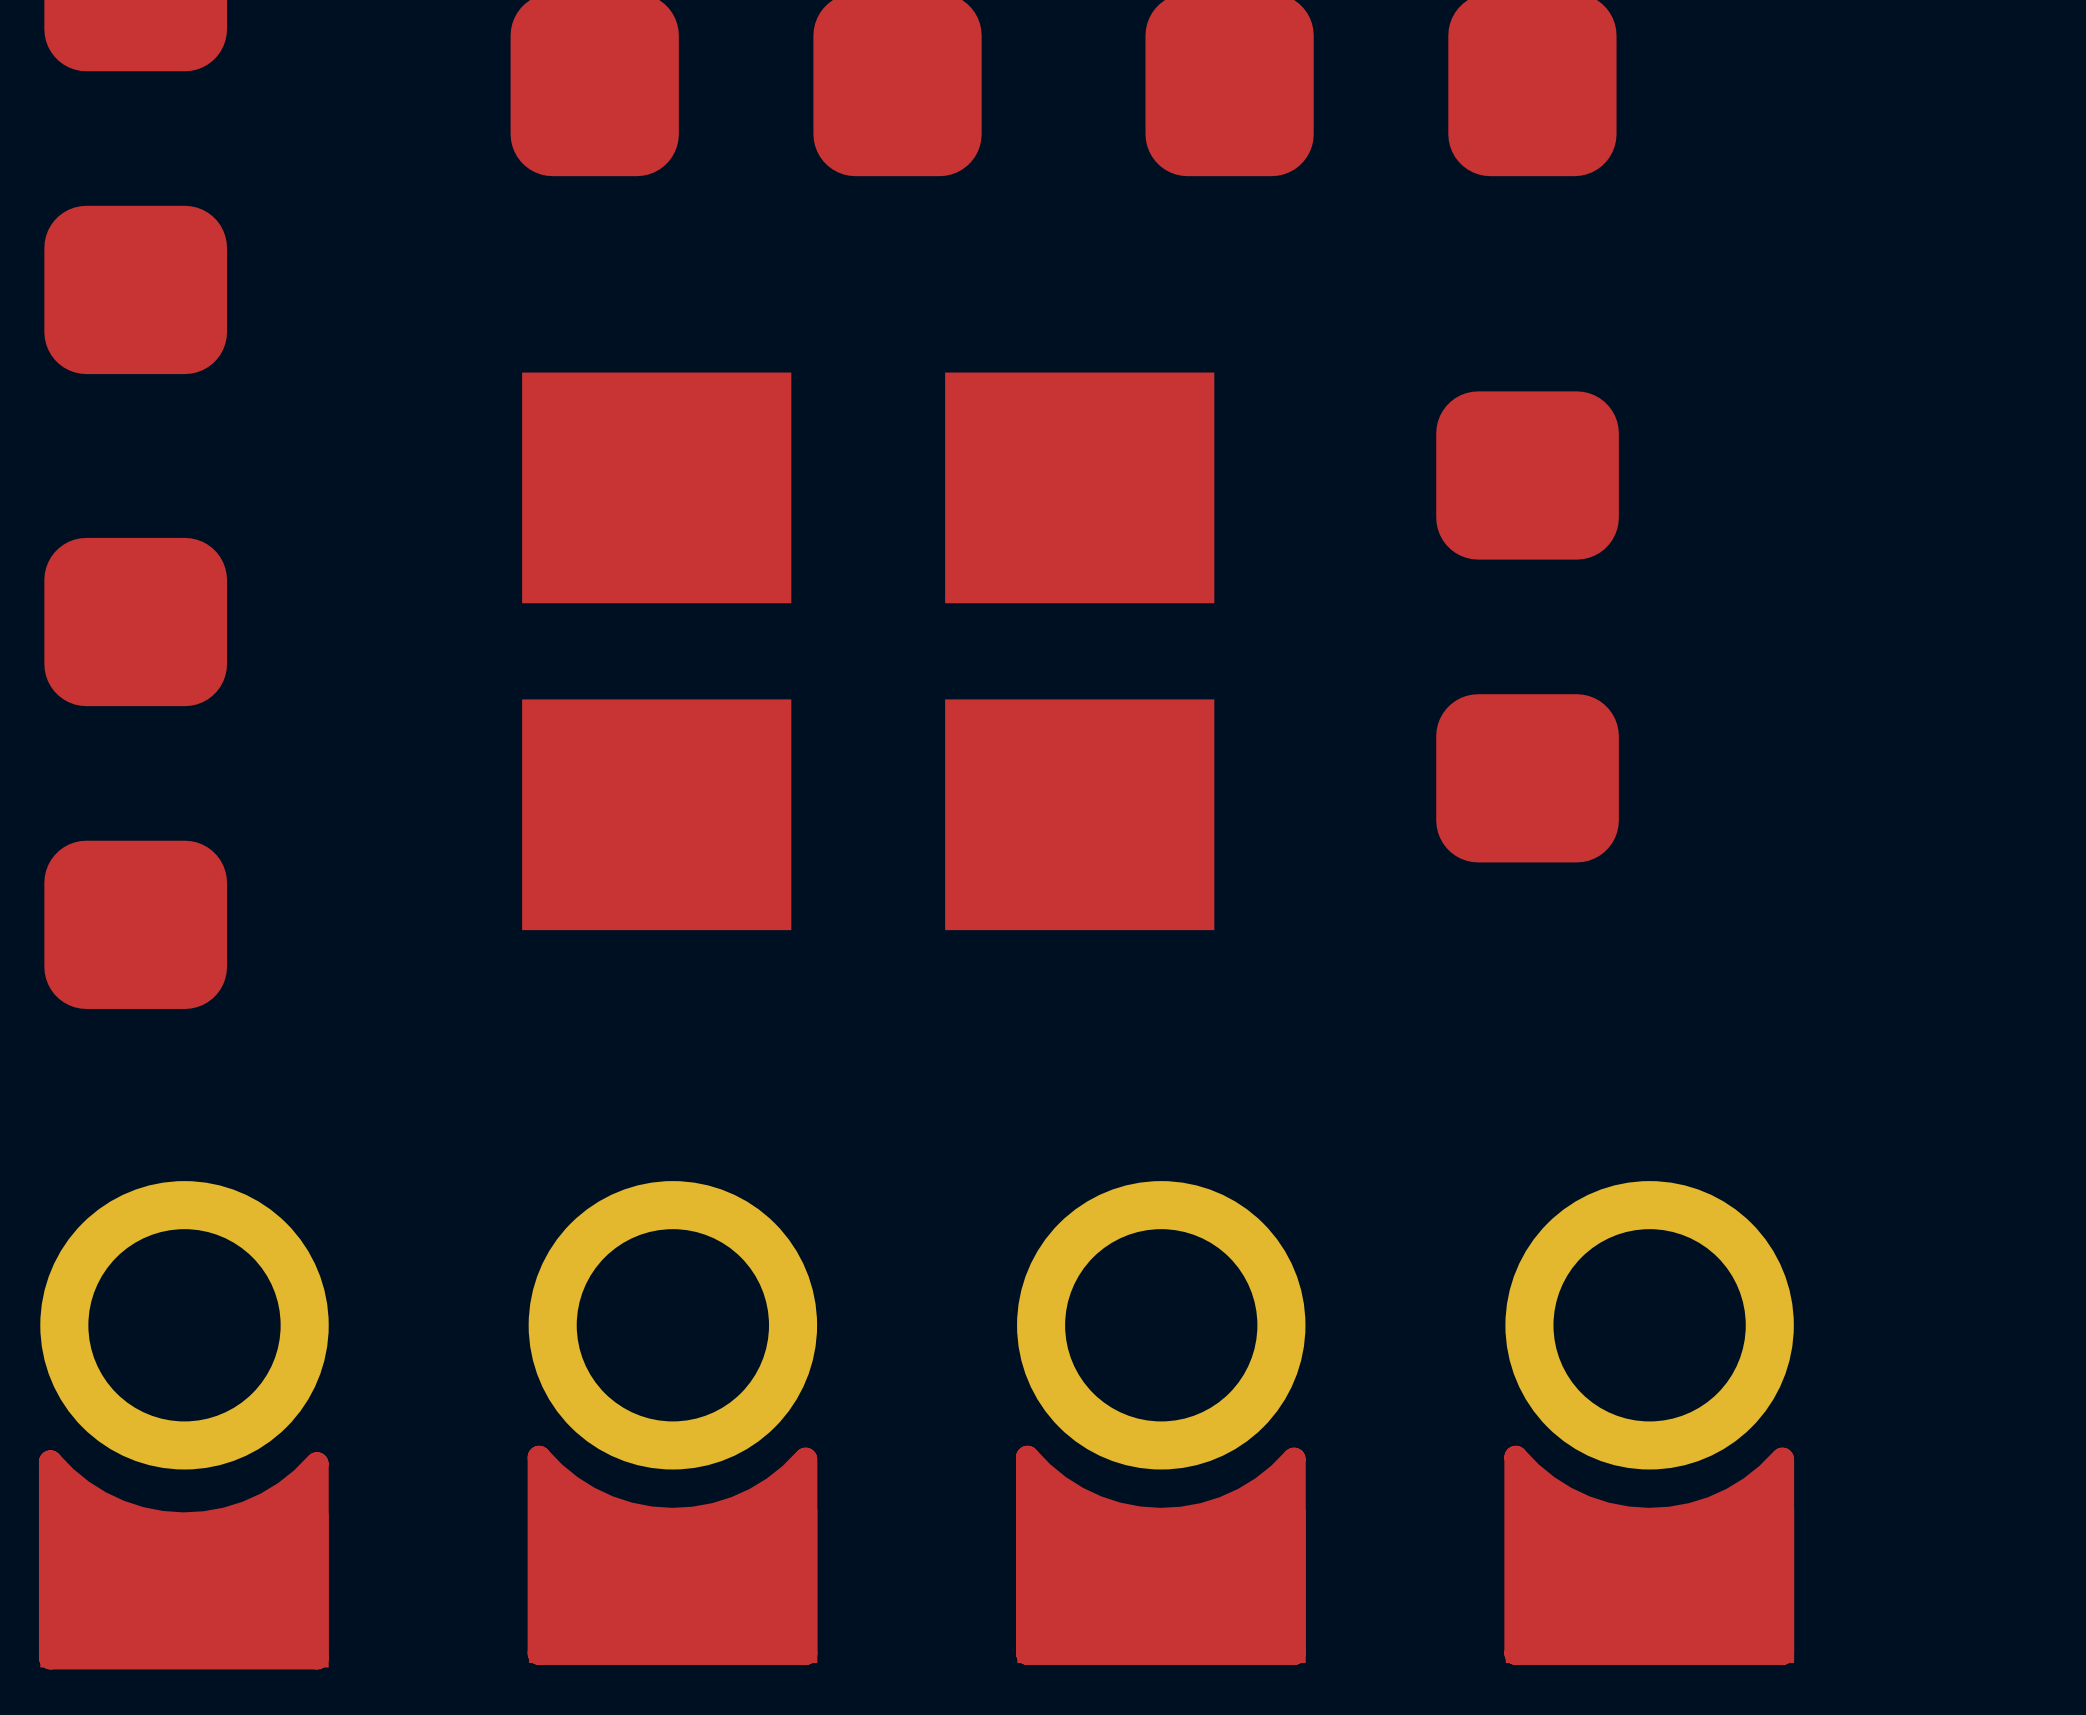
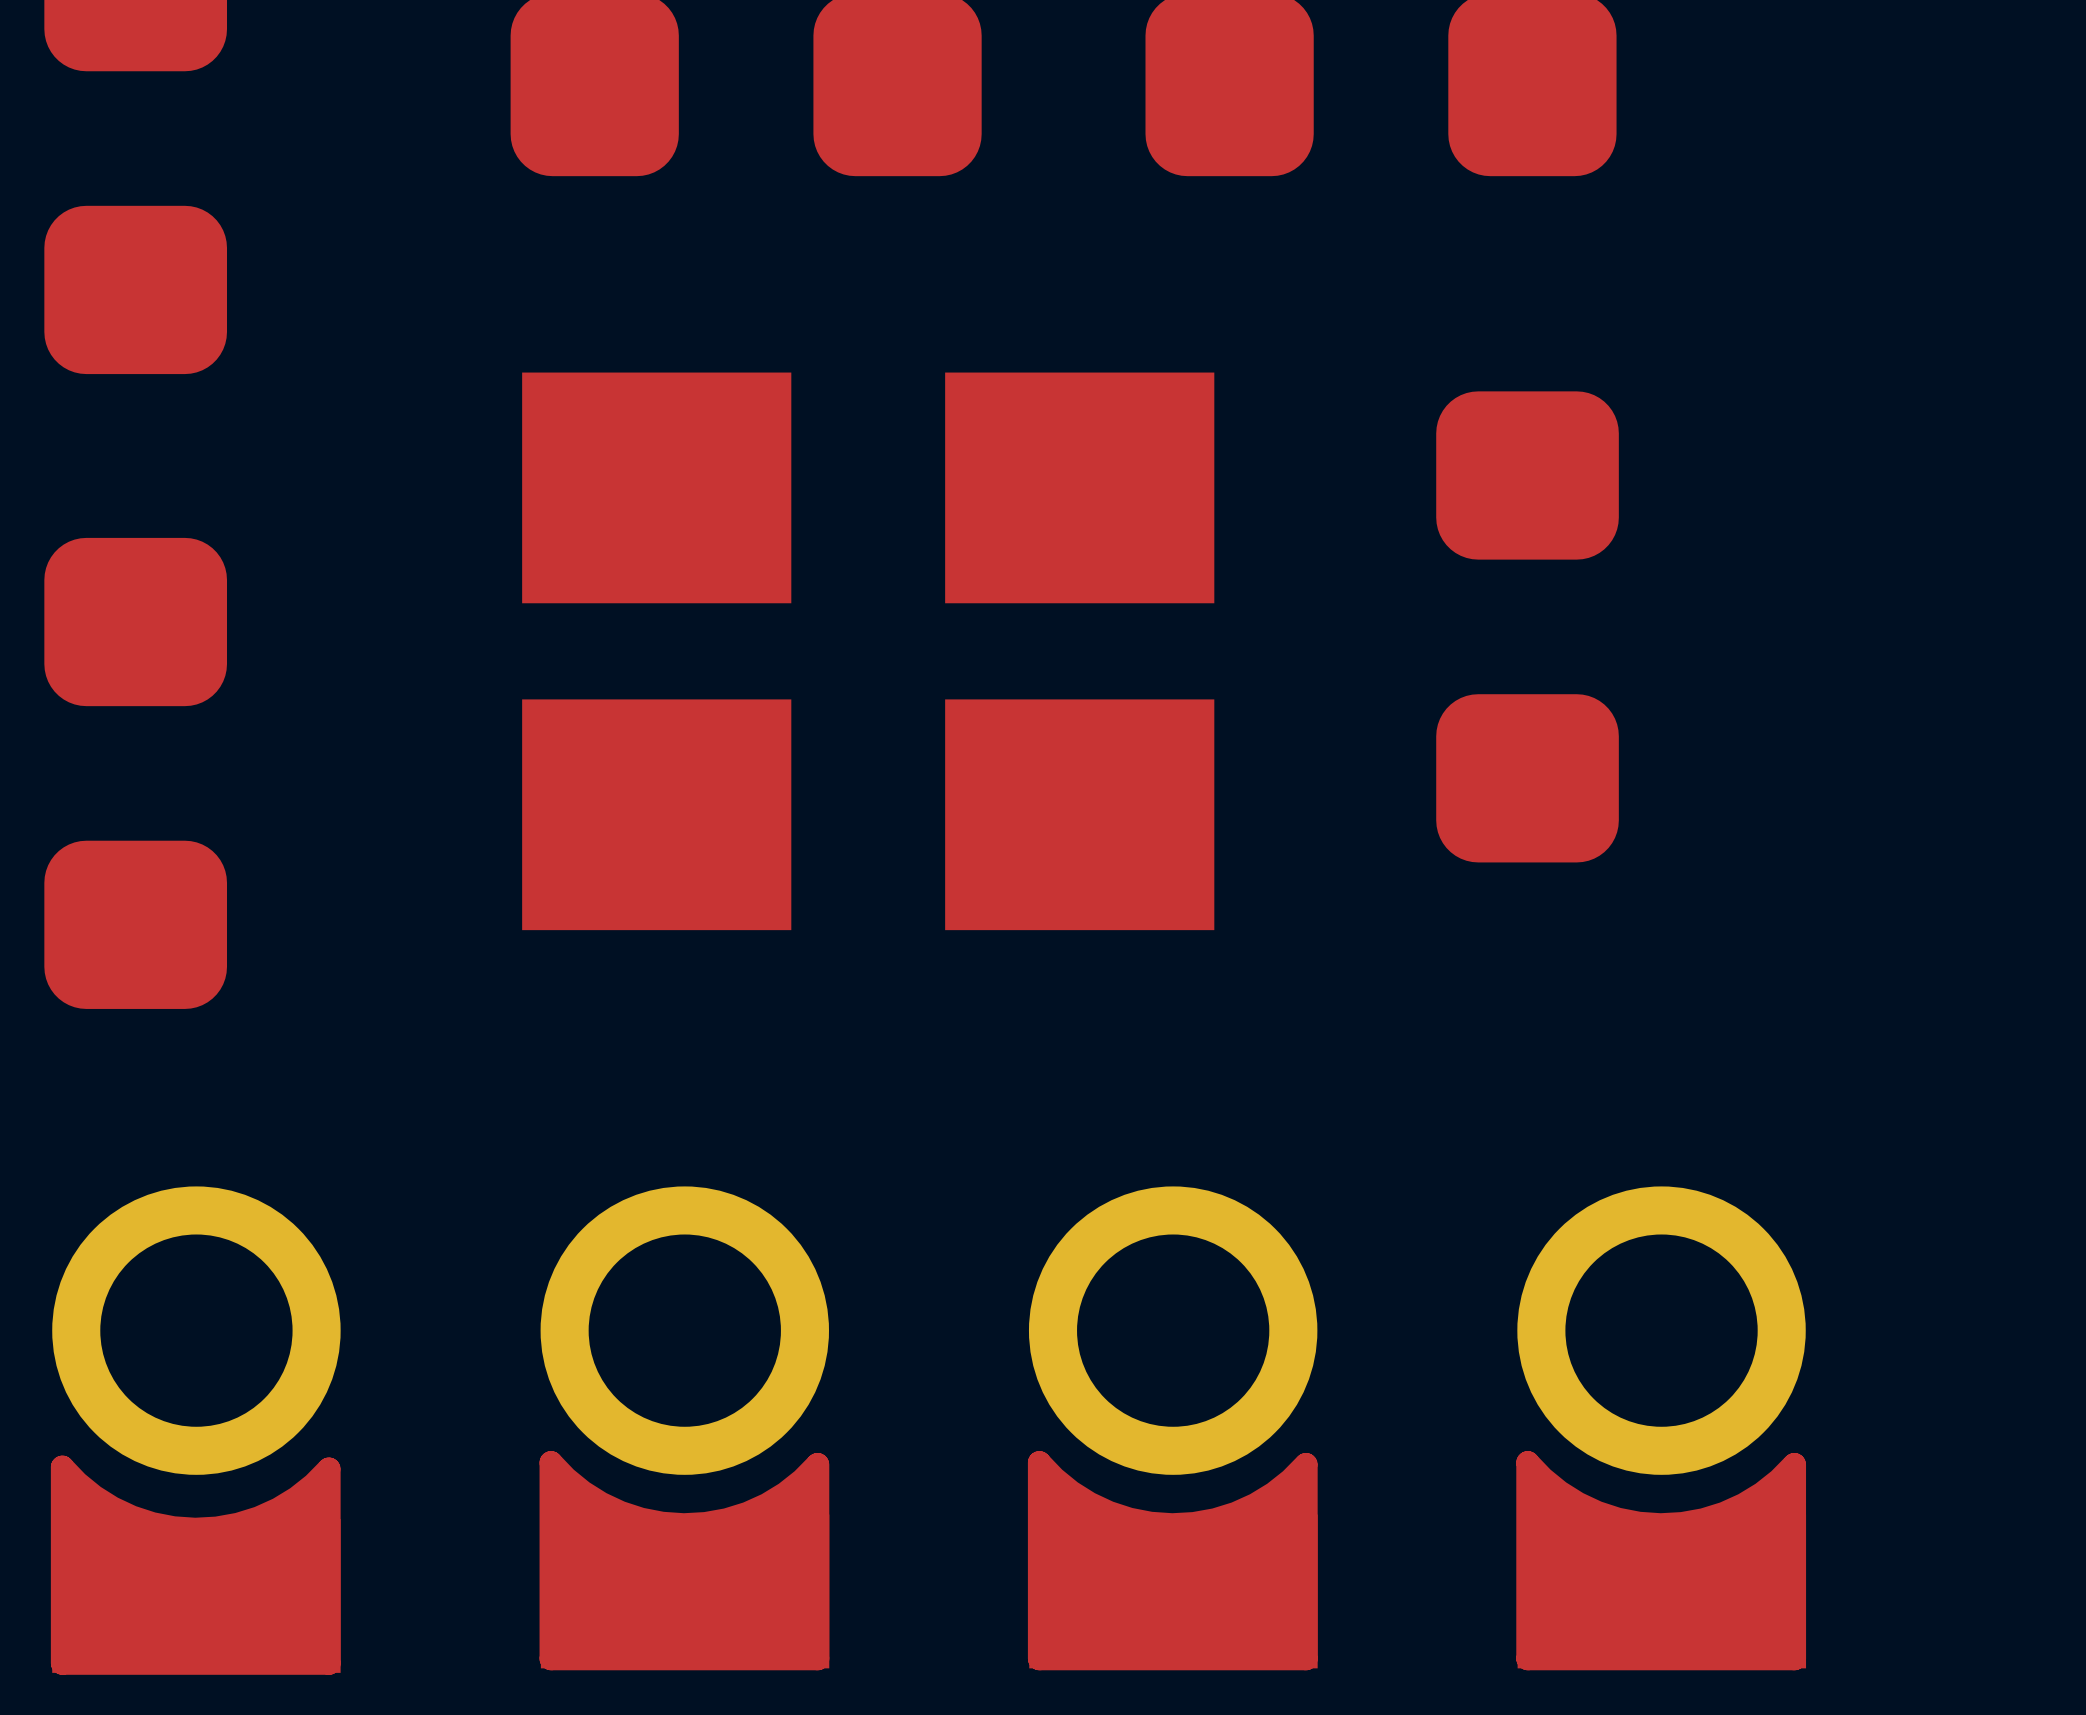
part position: (916, 1425) -> (928, 1430)

